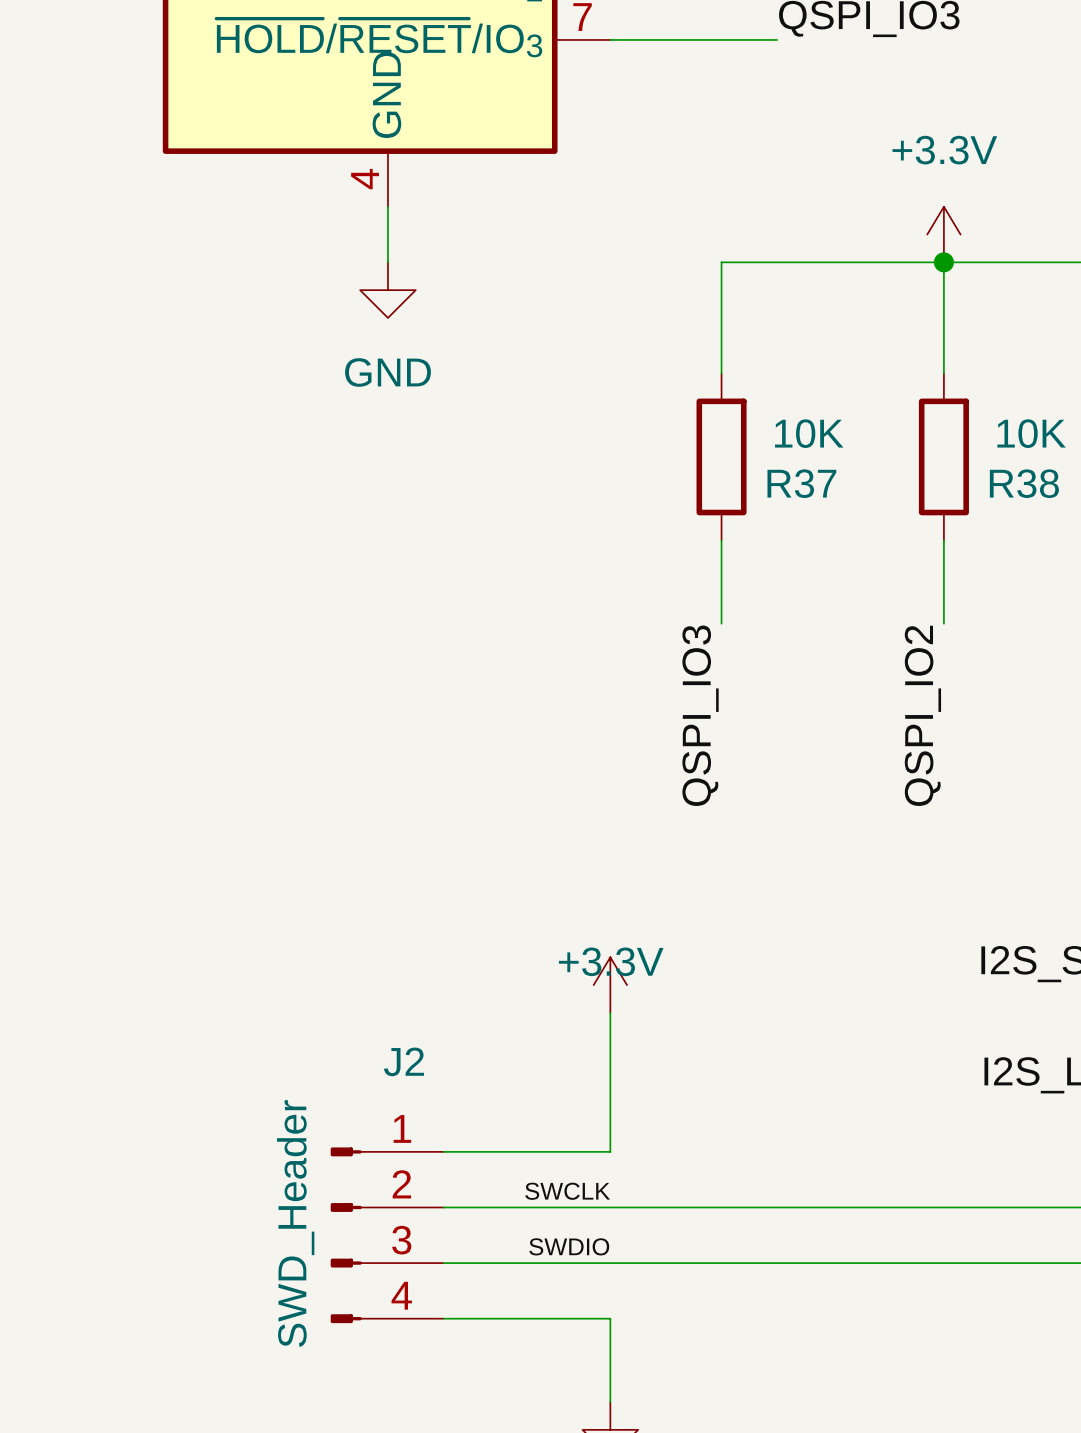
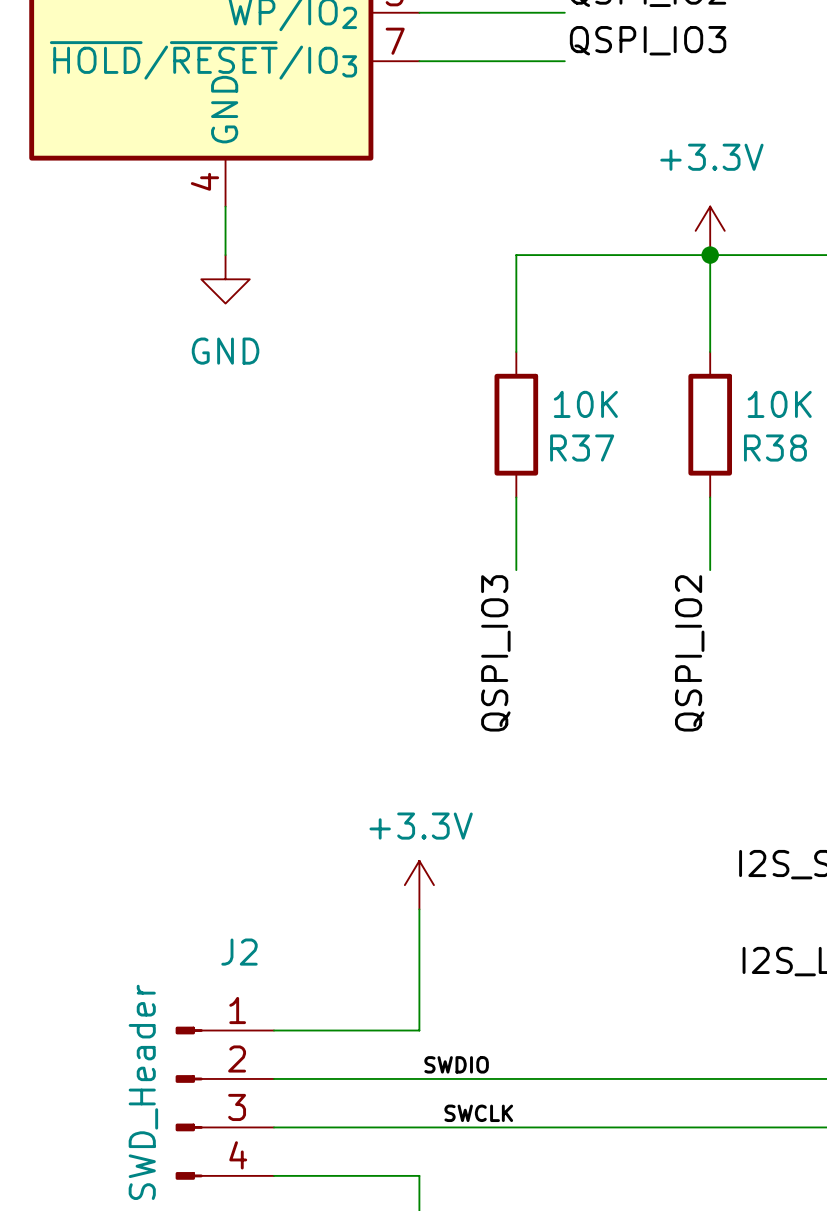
power symbol text position: +3.3V (611, 961) -> +3.3V (421, 826)
label position: SWCLK (567, 1191) -> SWCLK (478, 1113)
label position: SWDIO (569, 1246) -> SWDIO (456, 1064)

